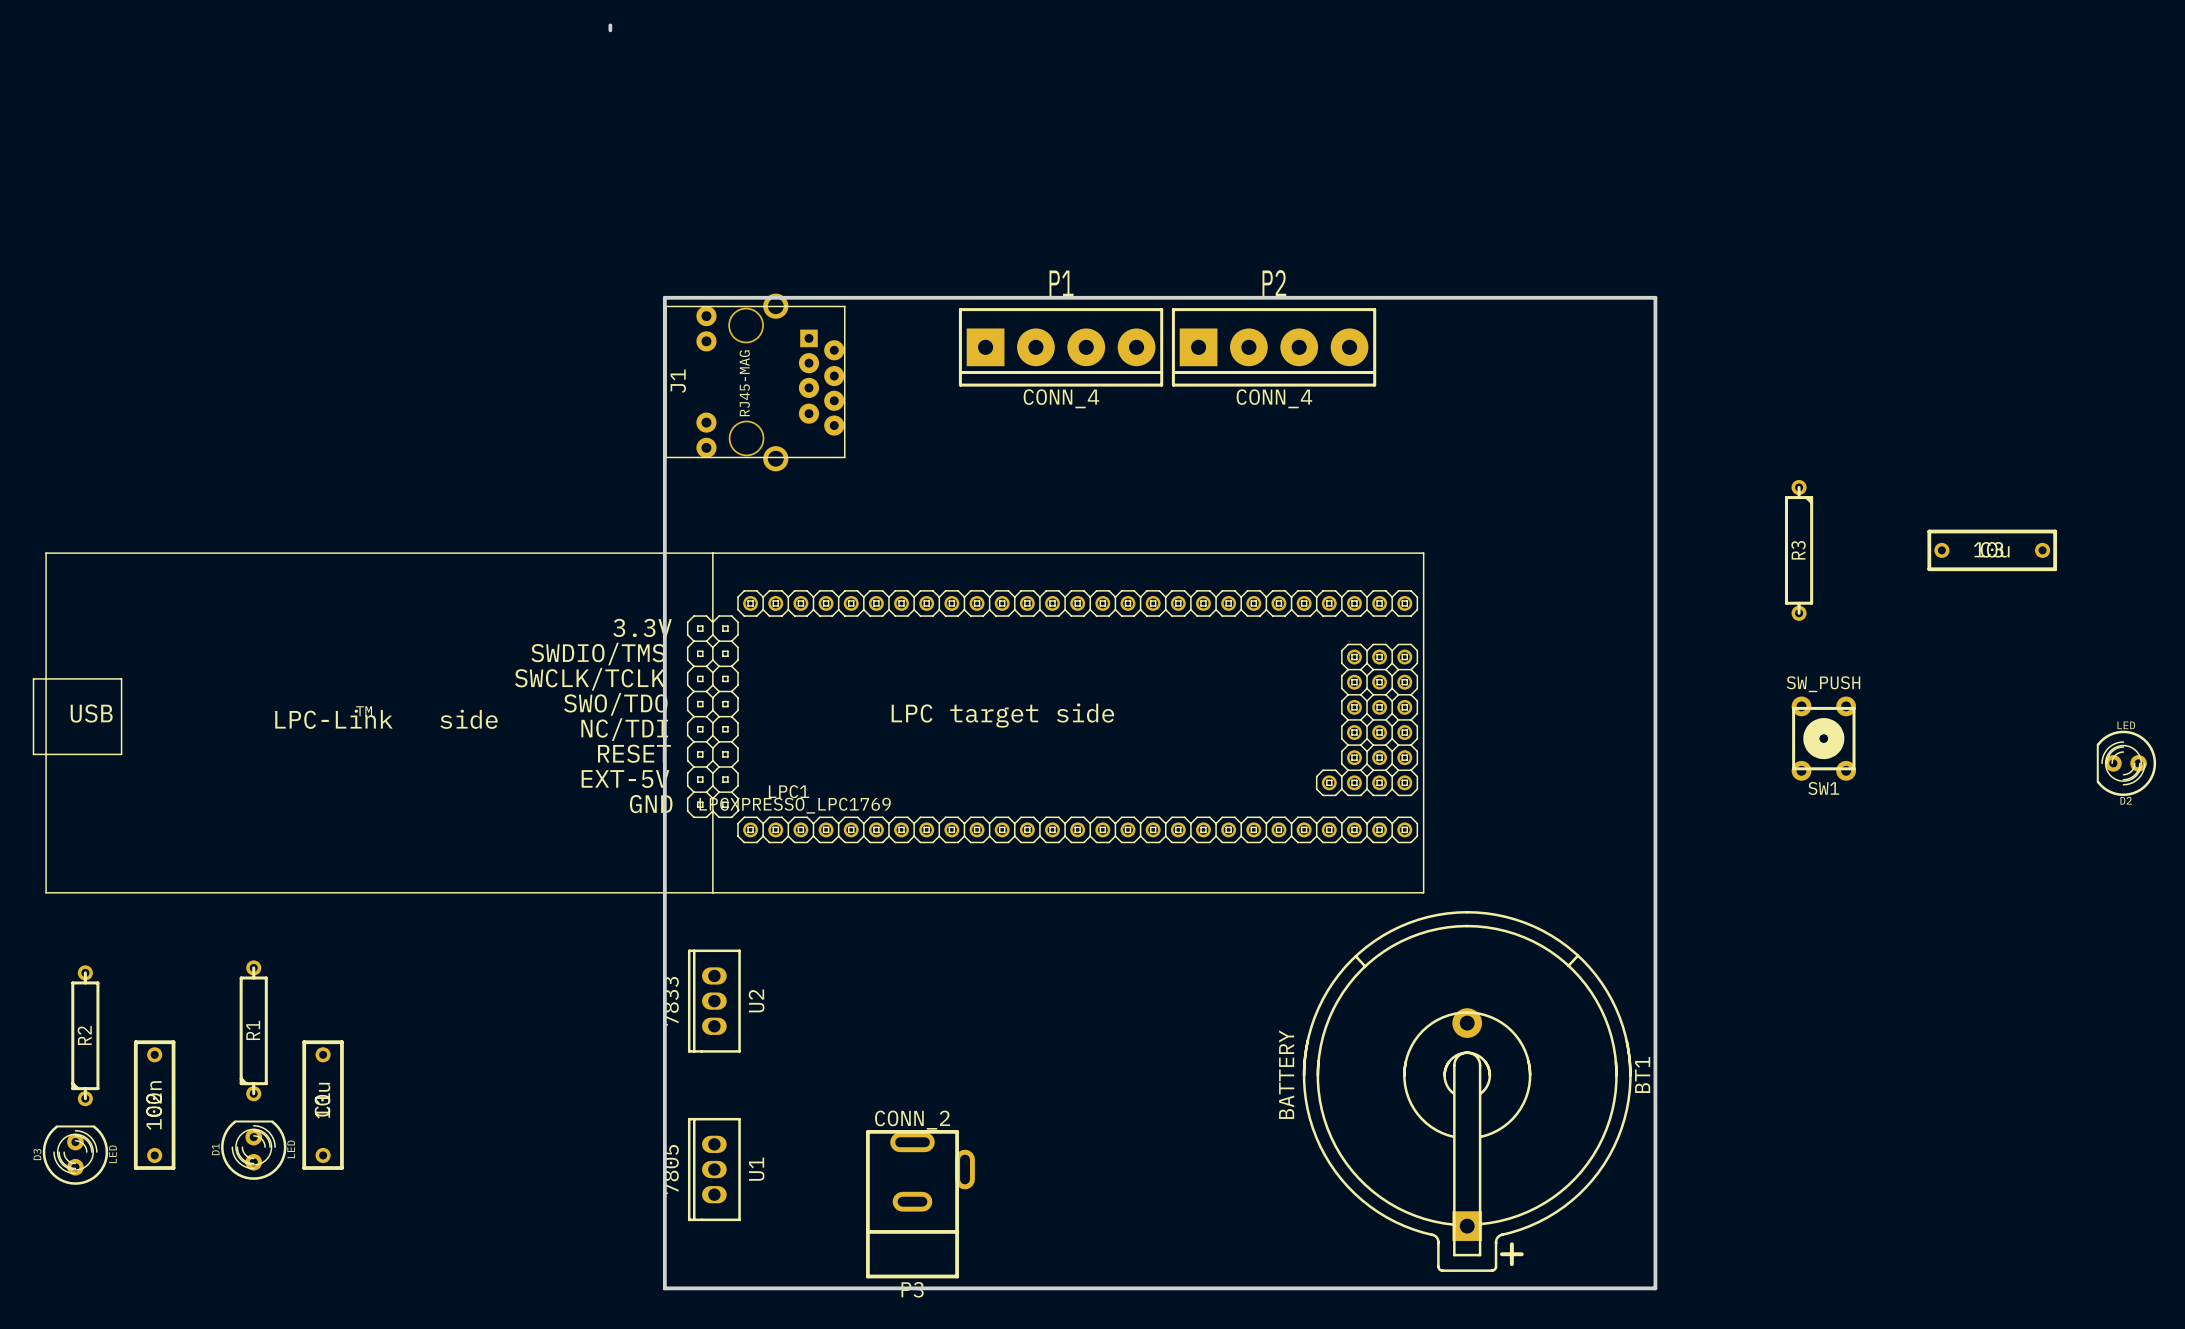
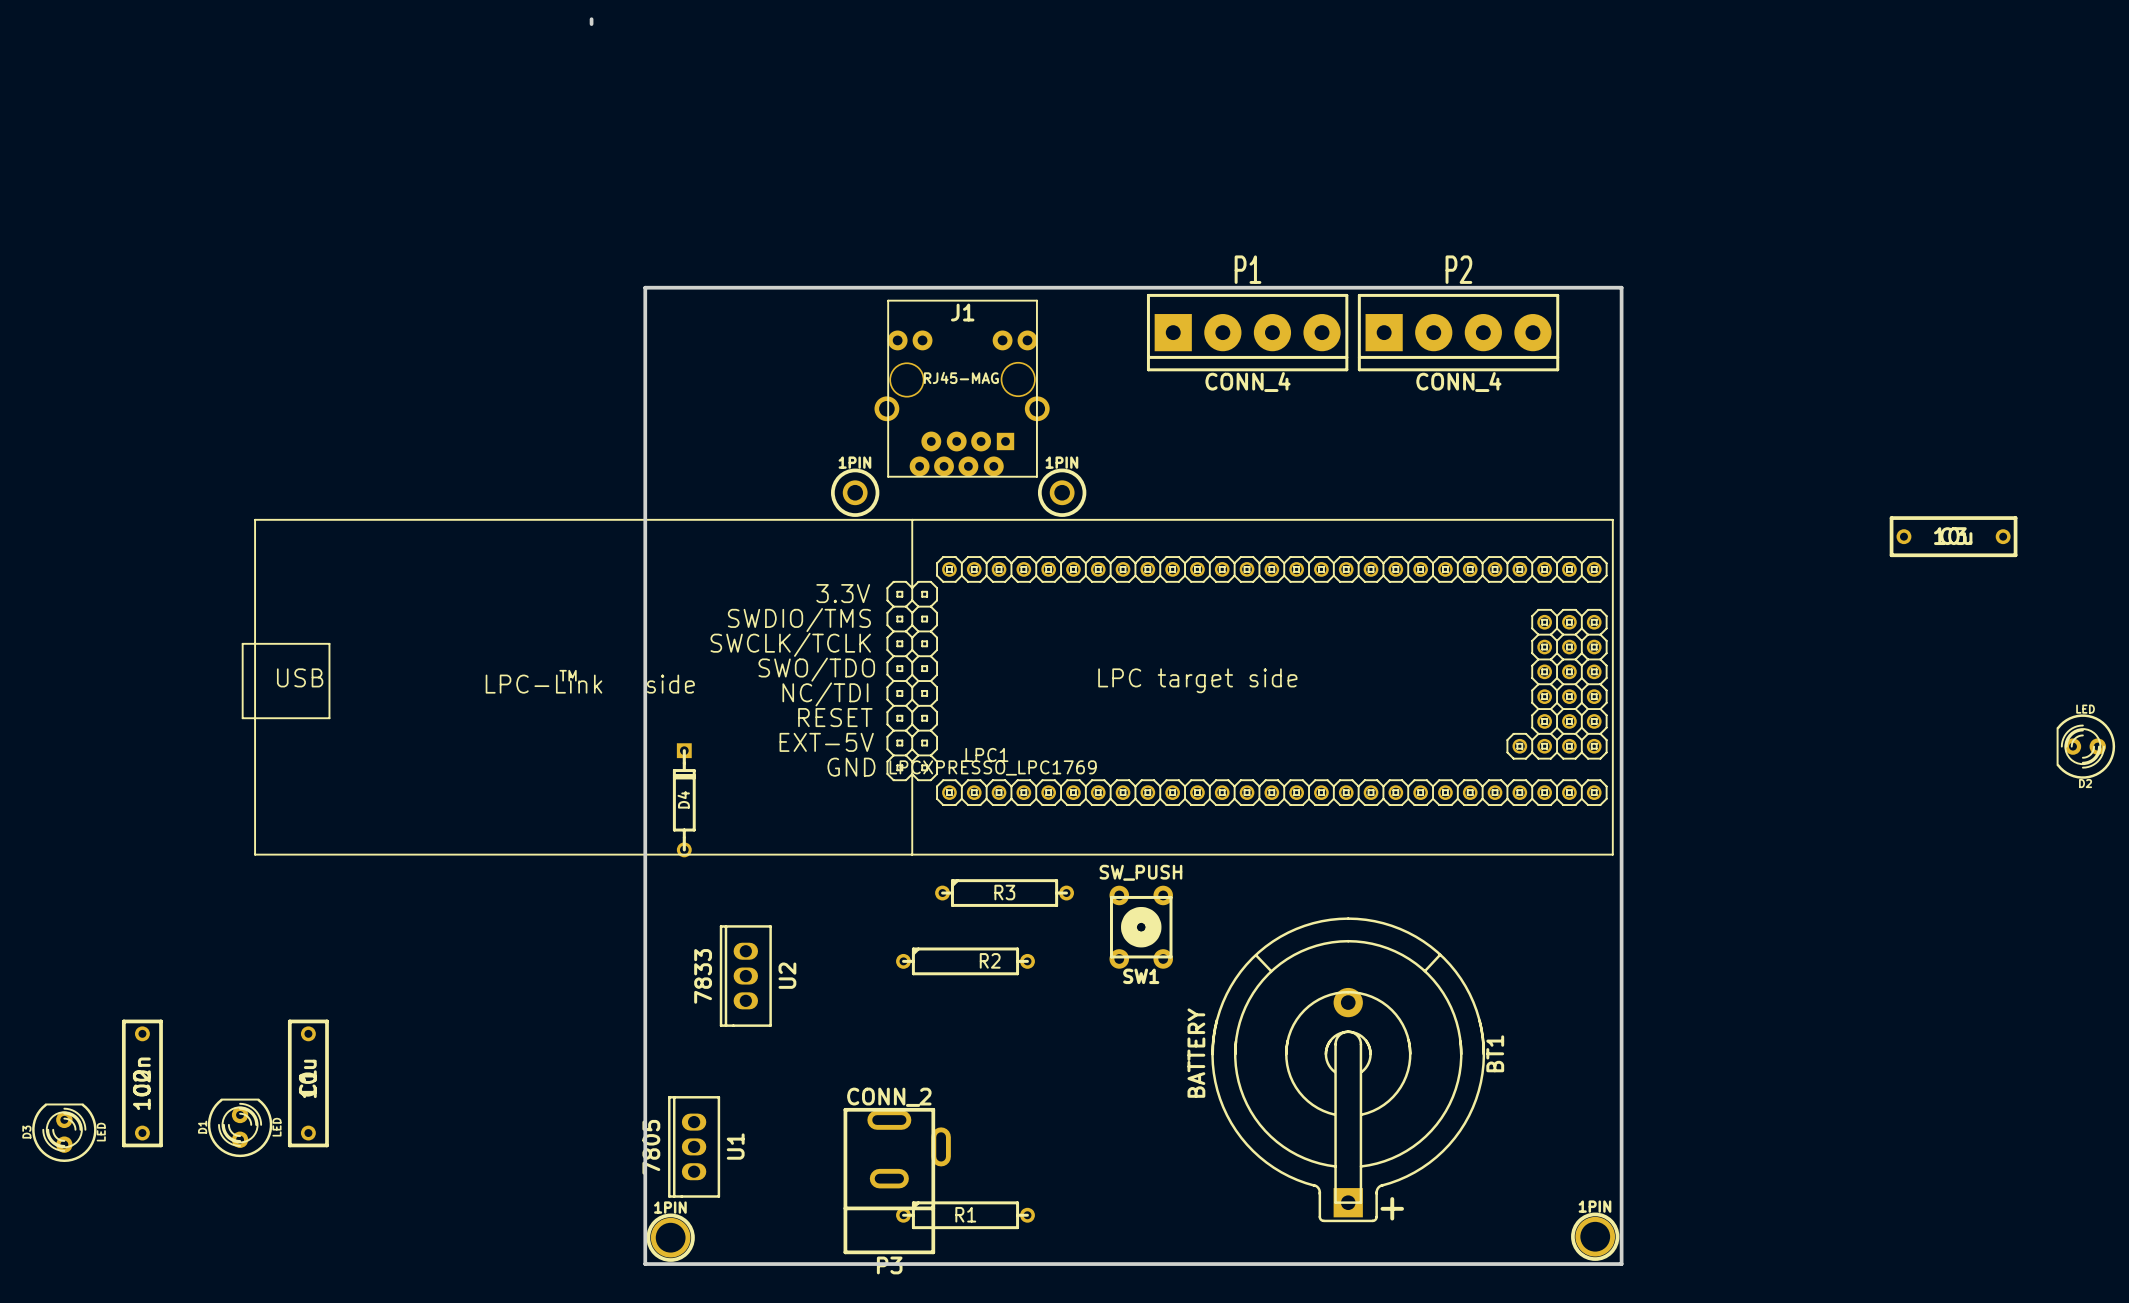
P1 position: (1061, 347) -> (1247, 332)
P2 position: (1274, 347) -> (1458, 332)
J1 rotation: 0° (755, 382) -> 90° clockwise (962, 388)
J1 position: (755, 382) -> (962, 388)
1PIN: none -> (855, 492)
1PIN: none -> (1062, 492)
R3 rotation: 0° (1799, 550) -> 90° counterclockwise (1004, 893)
R3 position: (1799, 550) -> (1004, 893)
LPC1 position: (728, 722) -> (927, 687)
SW1 position: (1823, 738) -> (1141, 927)
D4: none -> (684, 800)
BT1 footprint: [1302, 910, 1632, 1272] -> [1211, 917, 1486, 1223]
U2 position: (714, 1001) -> (745, 976)
R1 rotation: 0° (253, 1030) -> 90° clockwise (965, 1215)
R1 position: (253, 1030) -> (965, 1215)
R2 name position: R2 (84, 1035) -> R2 (990, 960)
R2 rotation: 0° (85, 1035) -> 90° clockwise (965, 961)
R2 position: (85, 1035) -> (965, 961)
BT1 value position: BATTERY (1286, 1074) -> BATTERY (1196, 1053)
BT1 name position: BT1 (1642, 1074) -> BT1 (1495, 1053)
1PIN: none -> (1595, 1236)
1PIN: none -> (670, 1237)

